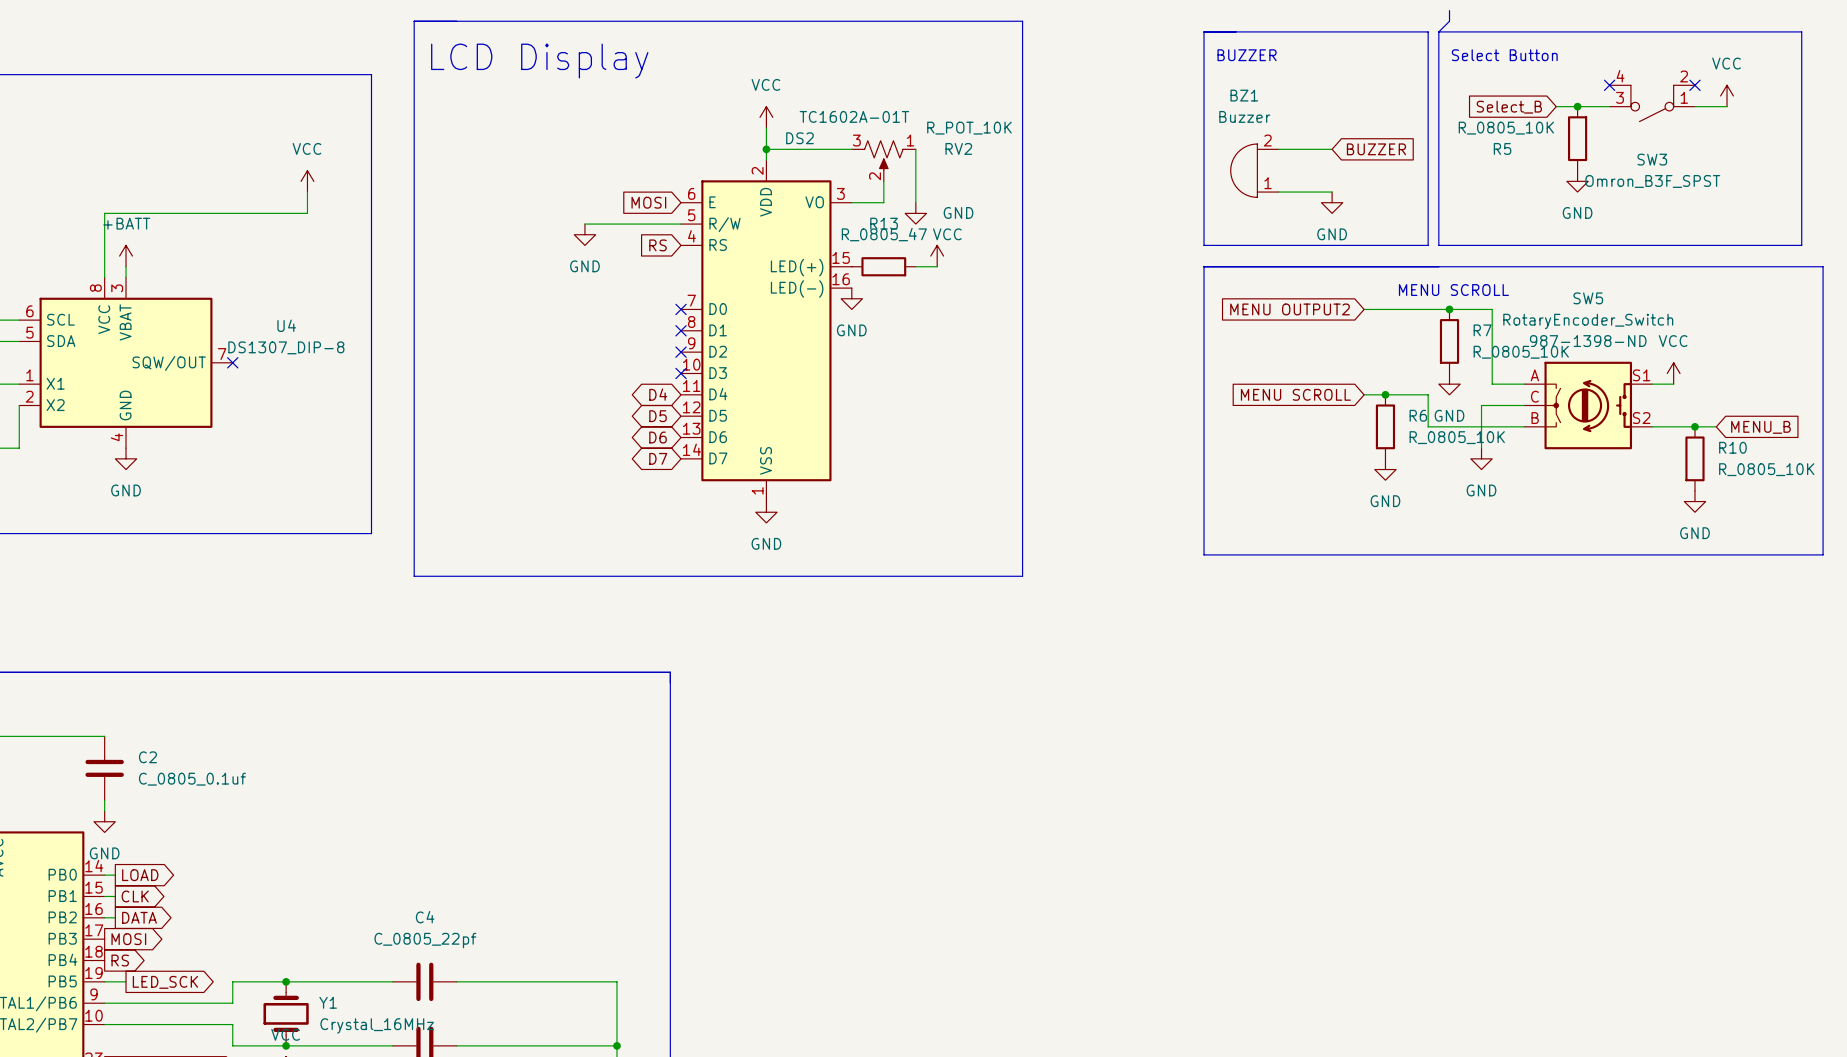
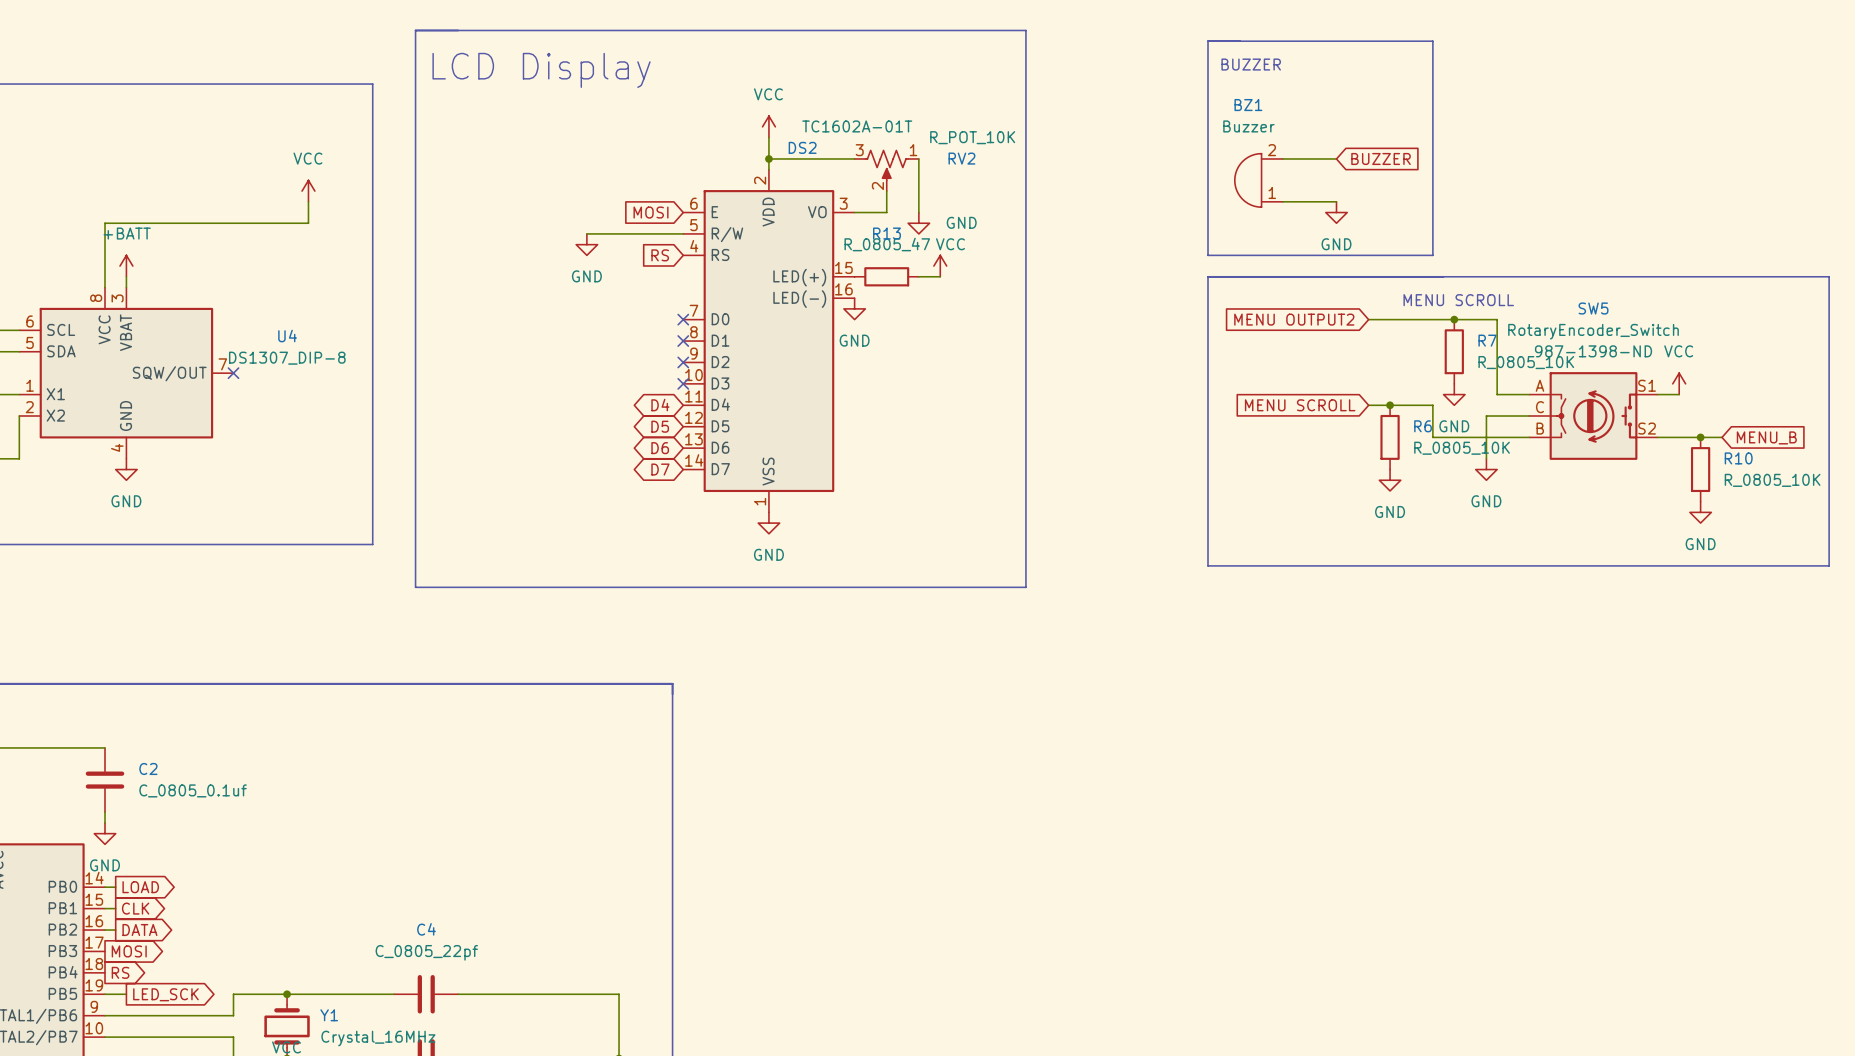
line: (1449, 10) (1449, 21) (1438, 31) -> none
line: (1438, 31) (1801, 31) (1801, 245) (1438, 245) (1438, 31) -> none
text: Select Button (1504, 55) -> none
no-connect mark: (1609, 85) -> none
no-connect mark: (1694, 85) -> none
power symbol: VCC (1727, 95) -> none
SW3: Omron_B3F_SPST (1652, 103) -> none
wire: (1556, 106) (1609, 106) -> none
junction: (1577, 106) -> none
wire: (1694, 106) (1727, 106) -> none
global label: Select_B (1509, 107) -> none
R5: R_0805_10K (1577, 138) -> none
power symbol: GND (1577, 181) -> none

